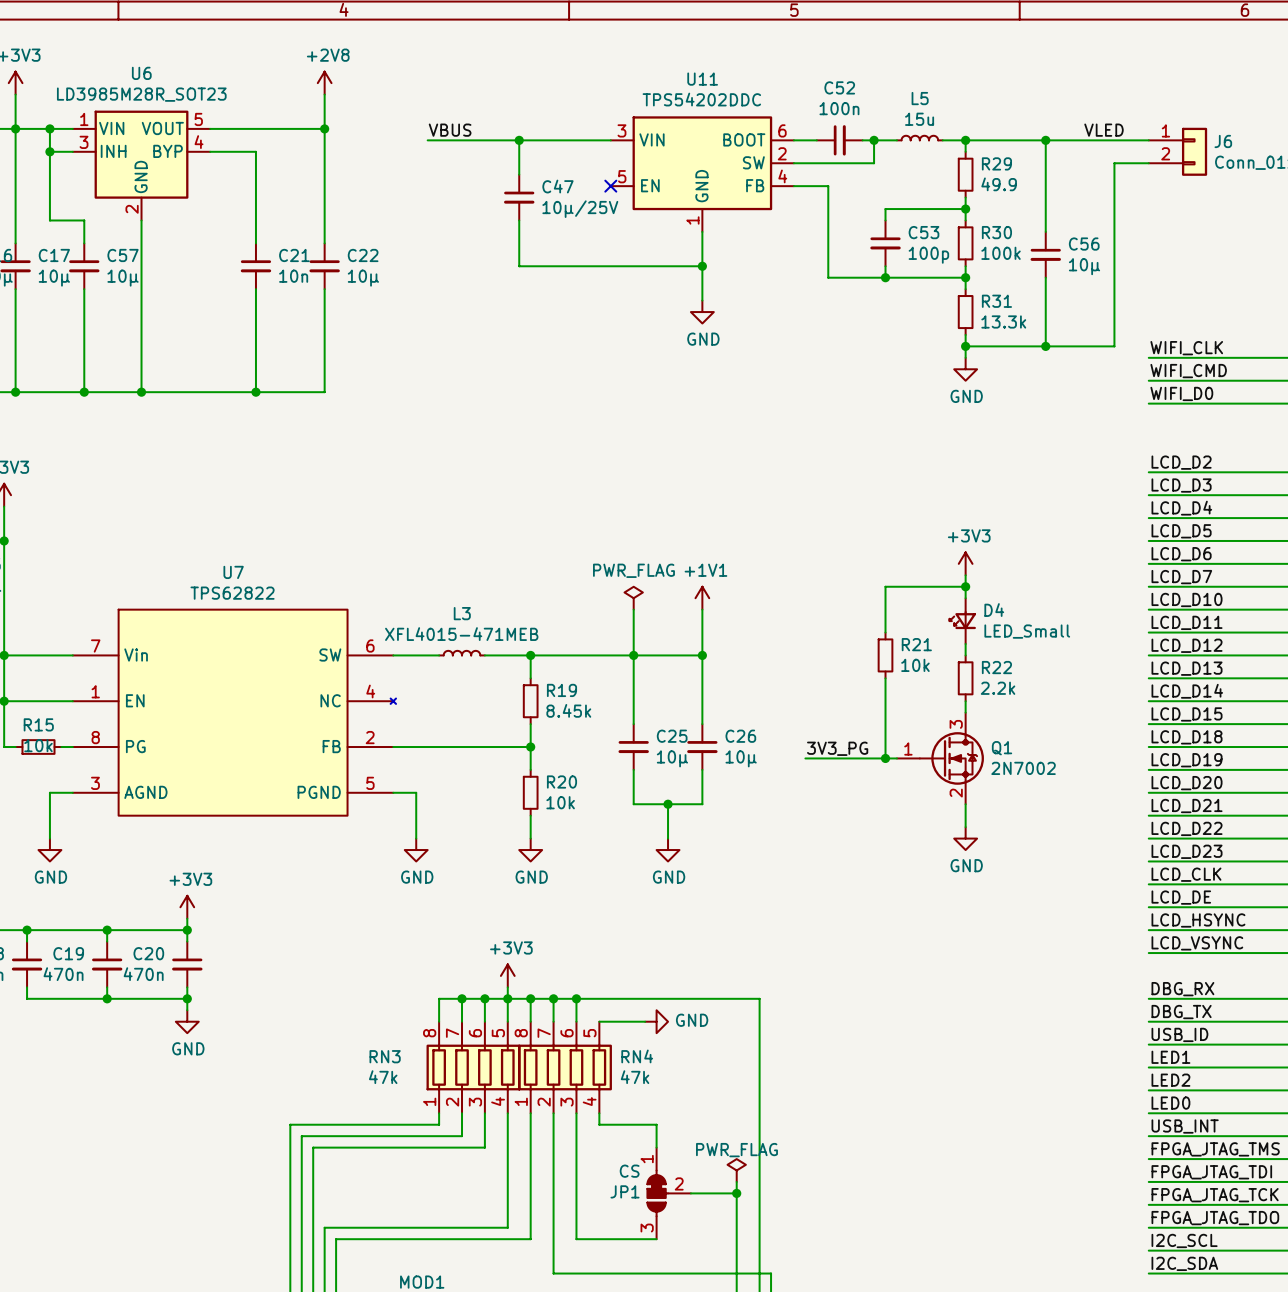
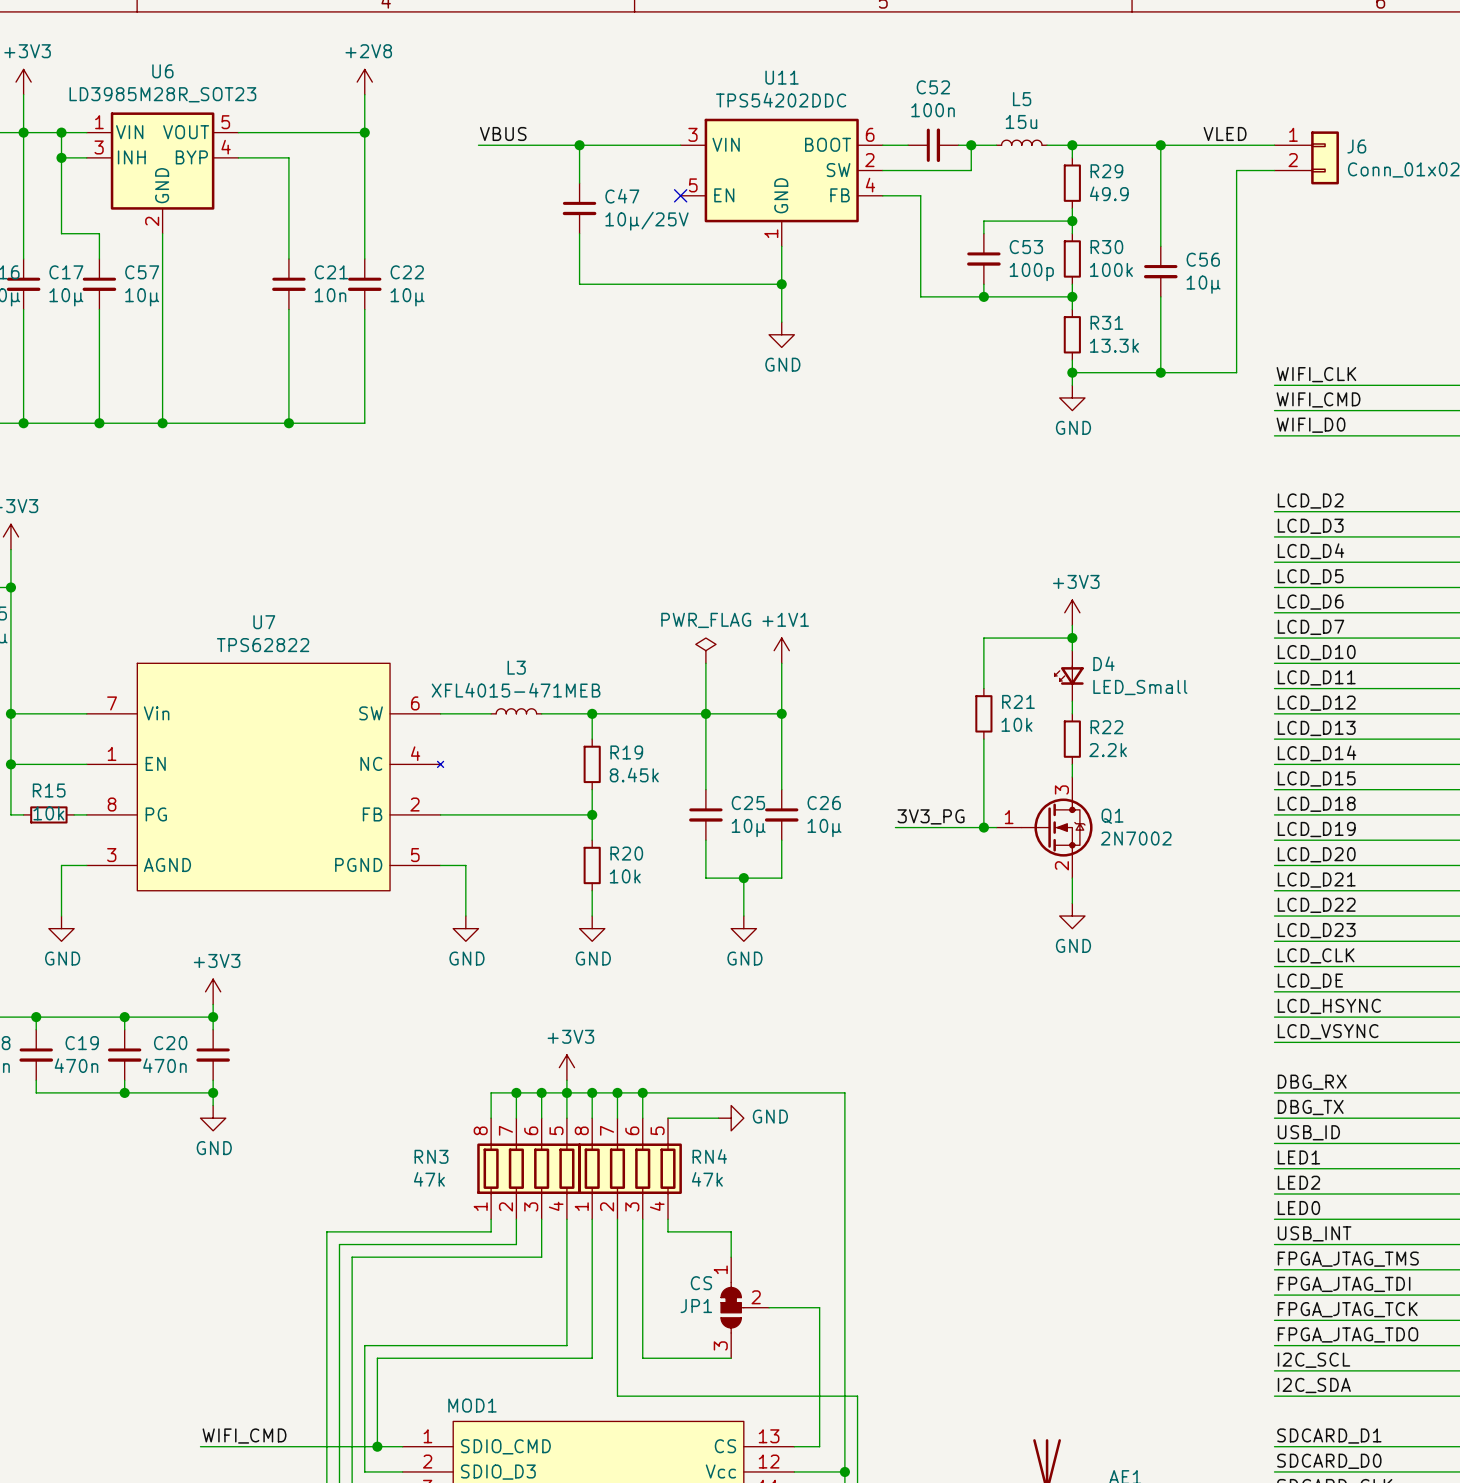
power symbol: PWR_FLAG (736, 1170) -> none
wire: (736, 1181) (736, 1193) -> none
junction: (736, 1193) -> none

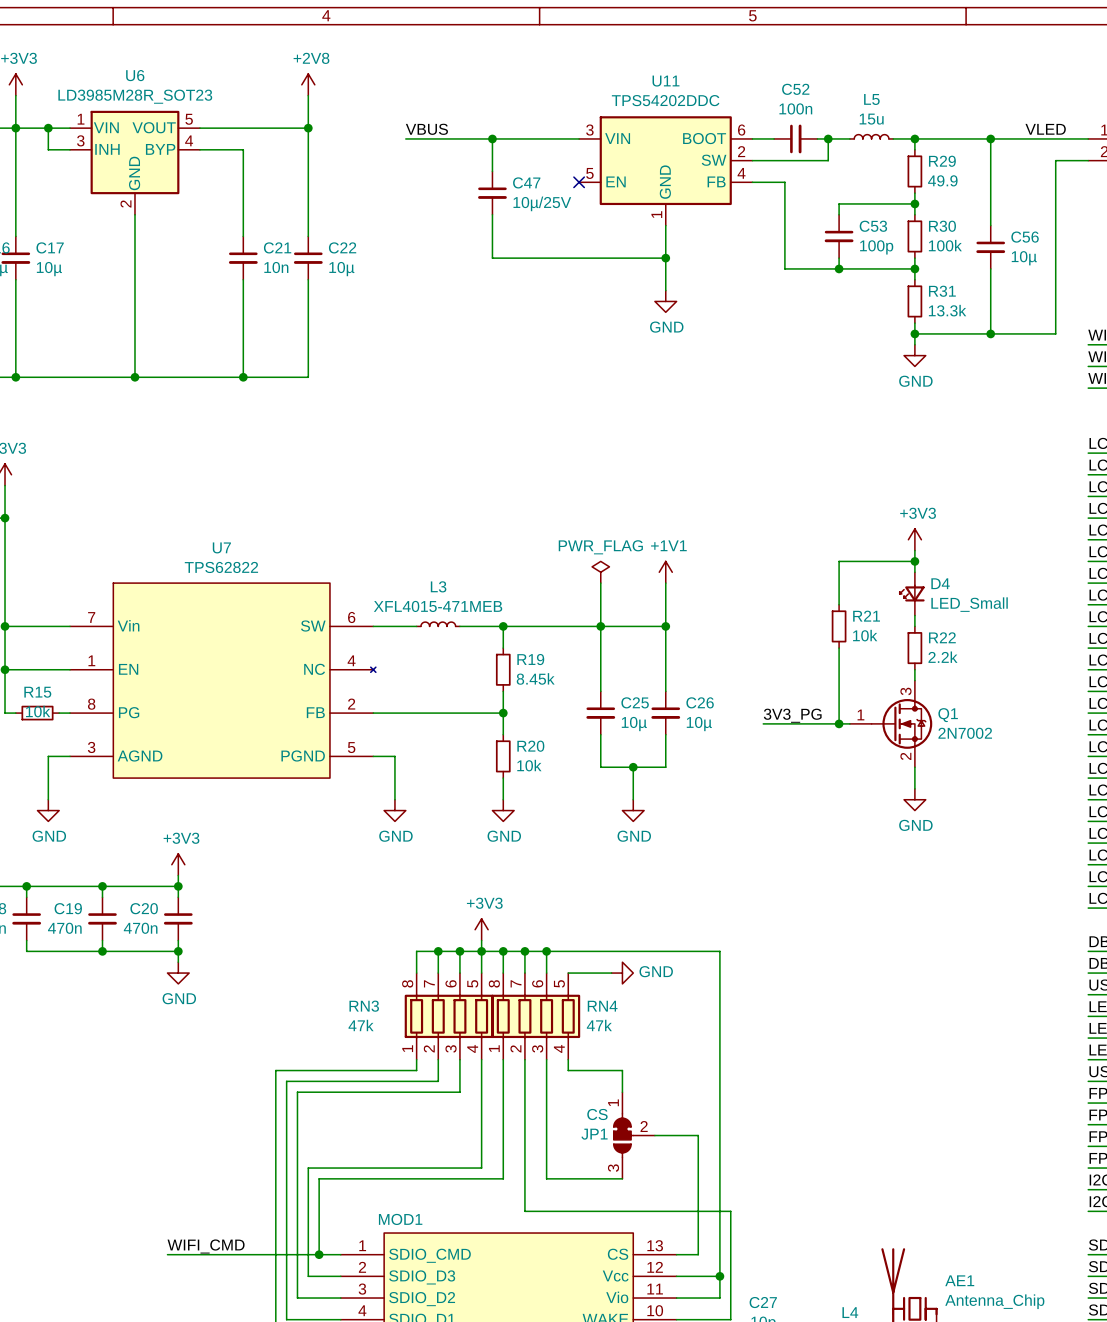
wire: (61, 157) (61, 233) (99, 233) (99, 258) -> none
junction: (61, 157) -> none
C57: 10µ (99, 284) -> none
wire: (99, 309) (99, 423) -> none
junction: (99, 423) -> none

